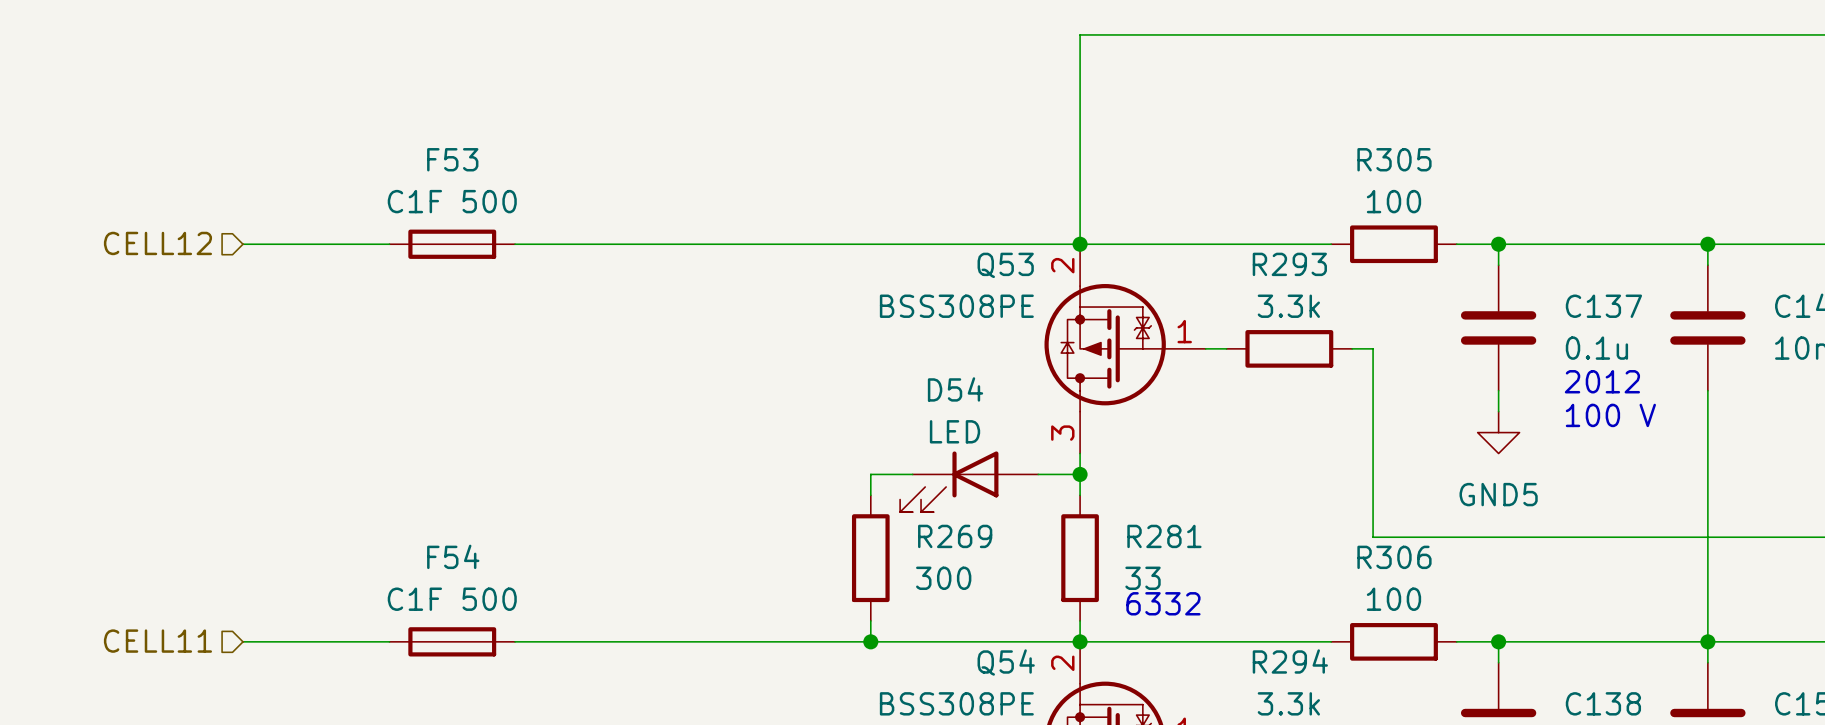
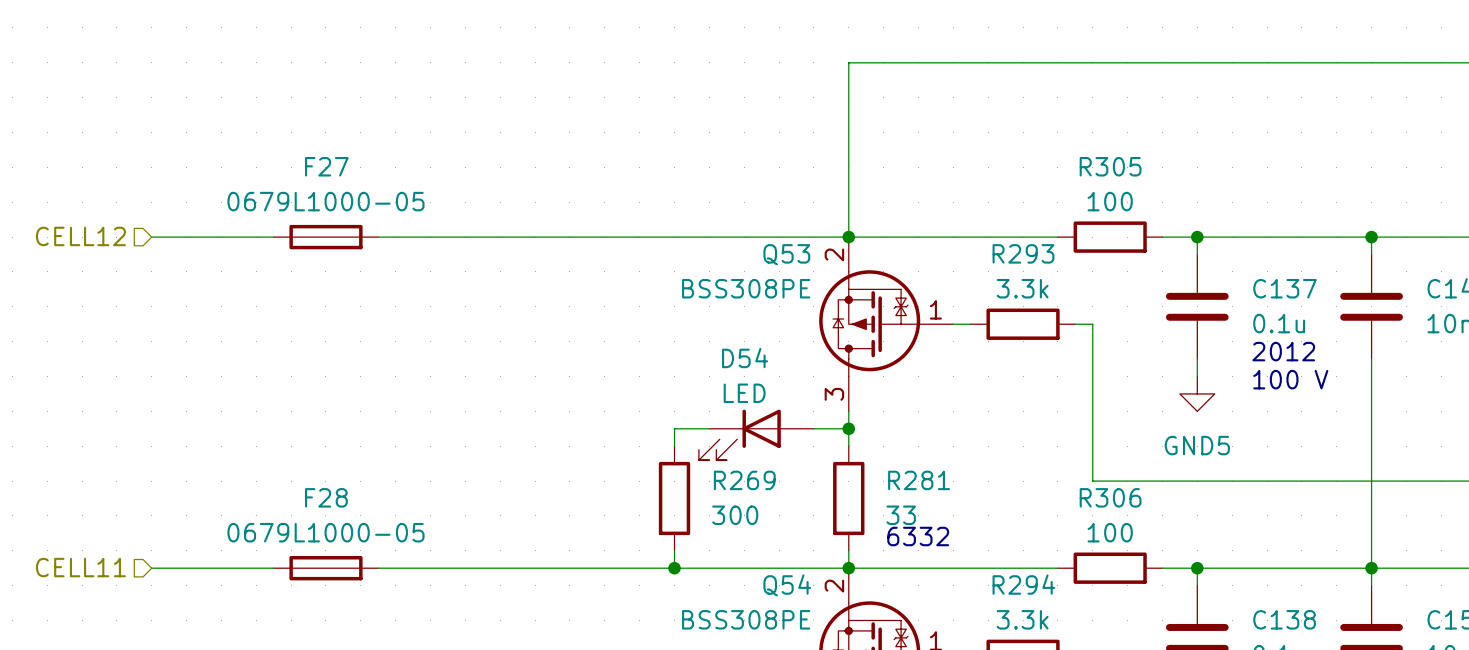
F53 name: F53 (452, 159) -> F27 (326, 166)
F53 value: C1F 500 (452, 201) -> 0679L1000-05 (325, 201)
F54 name: F54 (453, 556) -> F28 (326, 497)
F54 value: C1F 500 (452, 599) -> 0679L1000-05 (325, 532)

